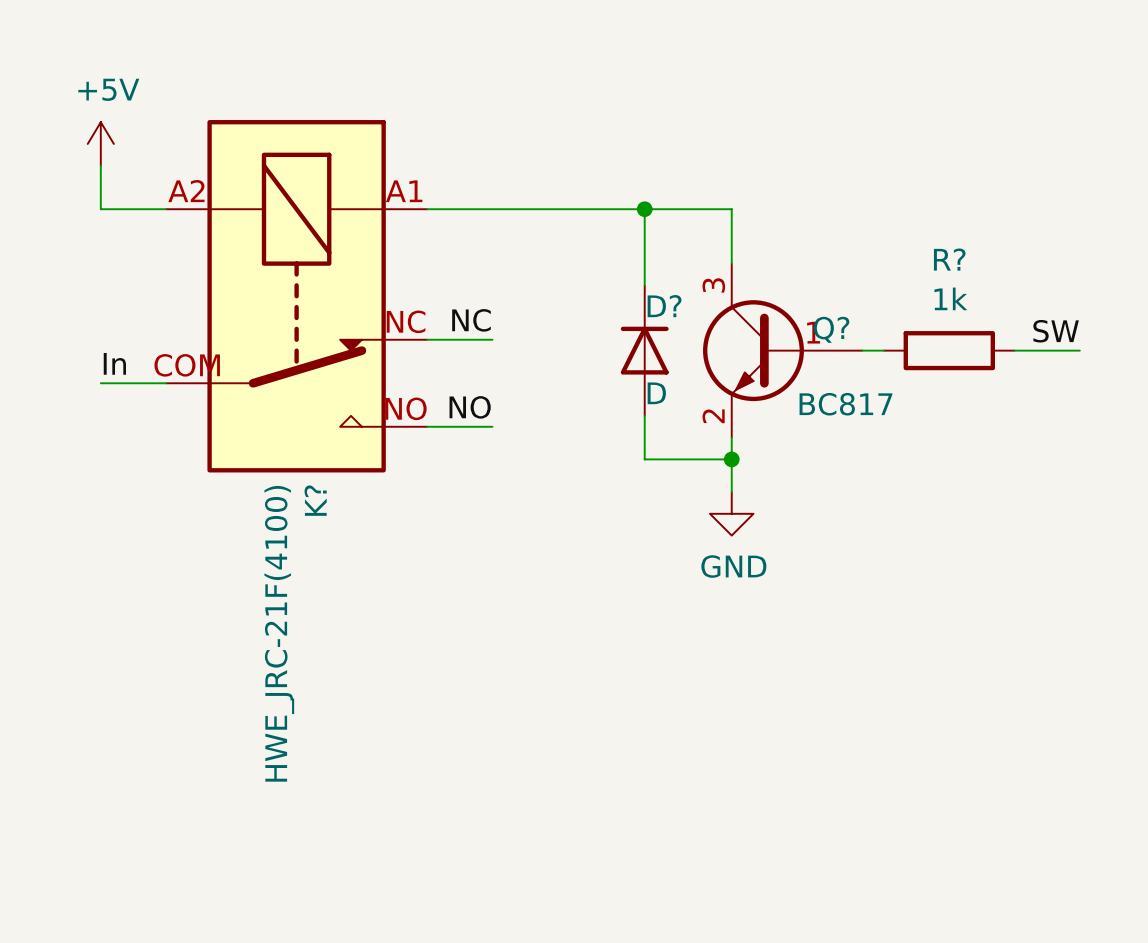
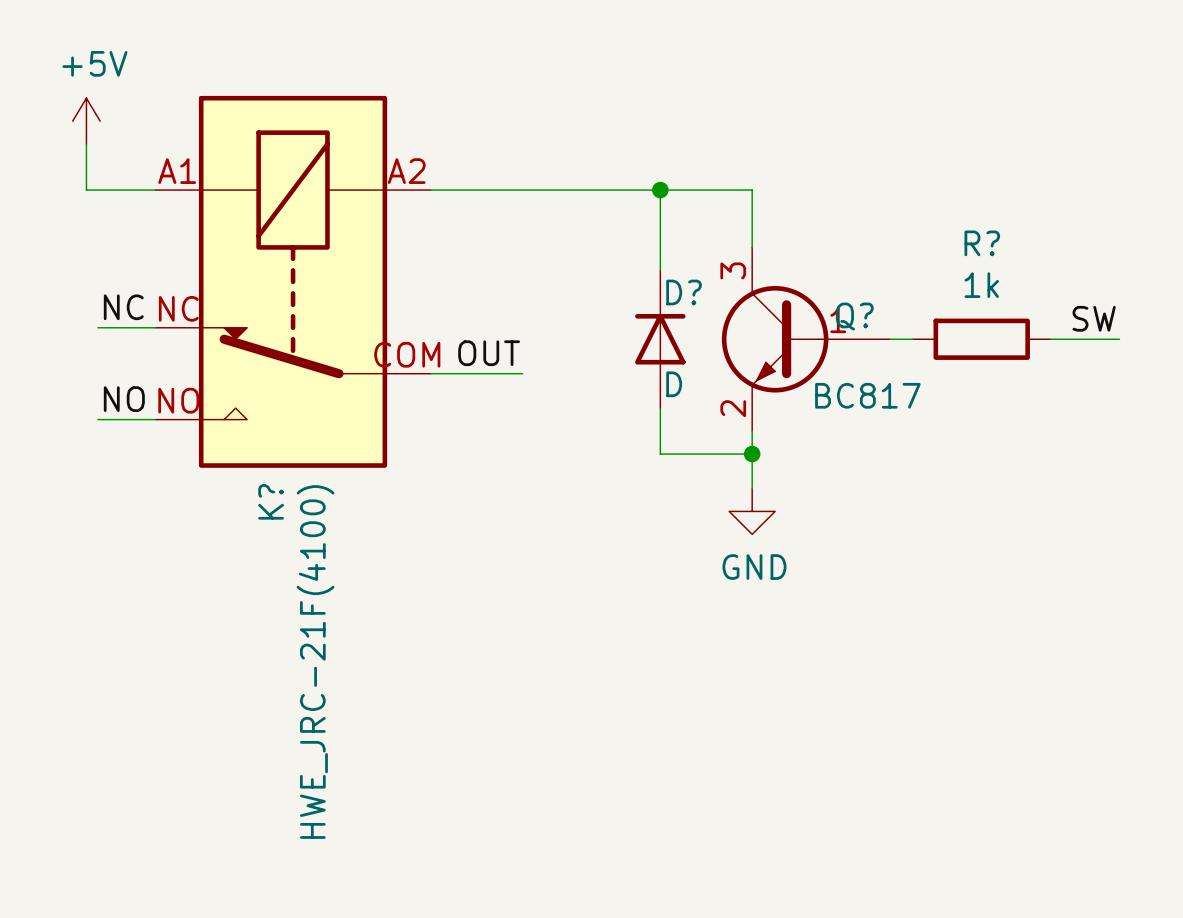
K? flip: as is (296, 296) -> left-right (293, 281)
label position: NC (471, 320) -> NC (123, 307)
wire: none -> (97, 327) (155, 327)
wire: (427, 339) (492, 339) -> none
label: In (114, 363) -> none
label: none -> OUT (489, 353)
wire: (100, 383) (166, 383) -> none
wire: none -> (430, 373) (522, 373)
label position: NO (470, 407) -> NO (124, 399)
wire: none -> (97, 419) (155, 419)
wire: (427, 426) (492, 426) -> none

